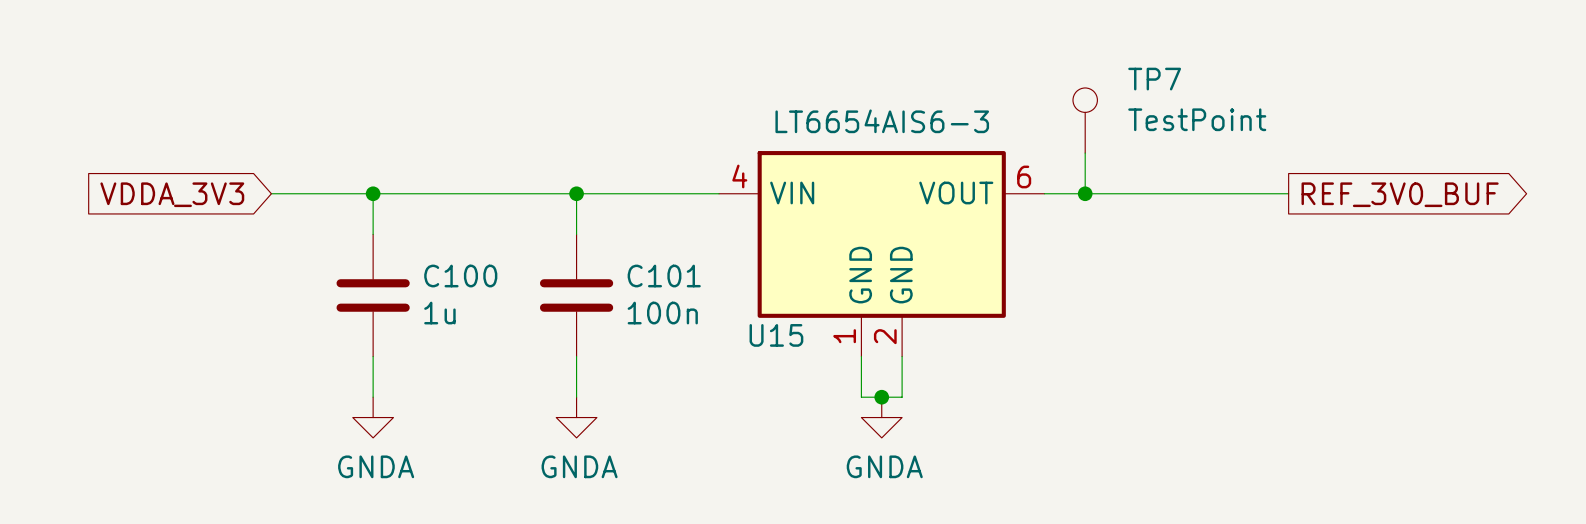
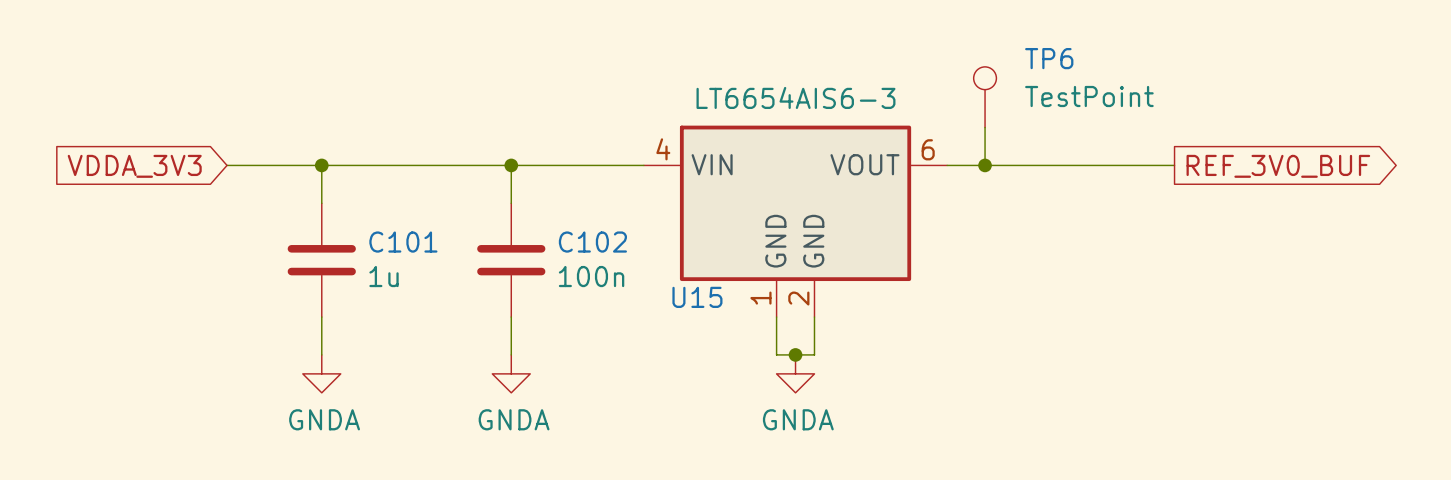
TP7 name: TP7 (1154, 79) -> TP6 (1049, 58)
C100 name: C100 (460, 276) -> C101 (403, 242)
C101 name: C101 (664, 276) -> C102 (592, 242)

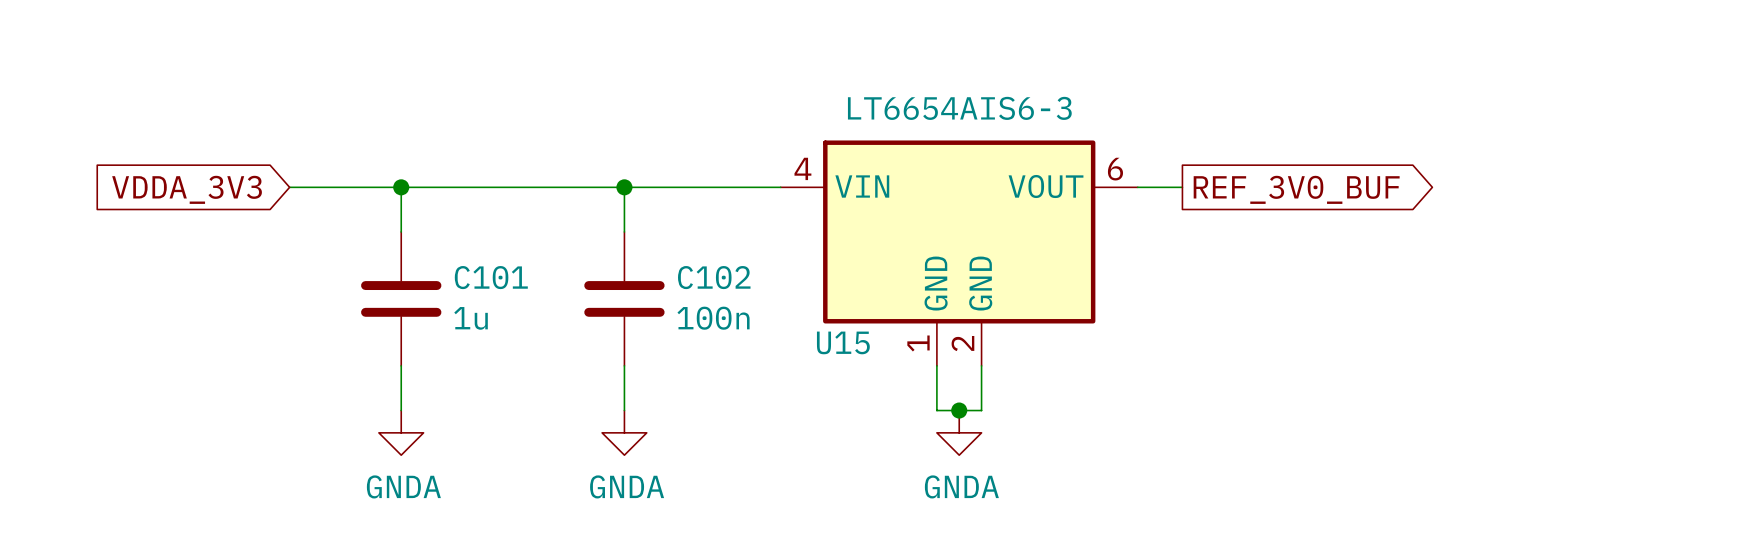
TP6: TestPoint (985, 97) -> none
wire: (985, 127) (985, 165) (1174, 165) -> none
junction: (985, 165) -> none
global label position: REF_3V0_BUF (1278, 166) -> REF_3V0_BUF (1296, 189)

